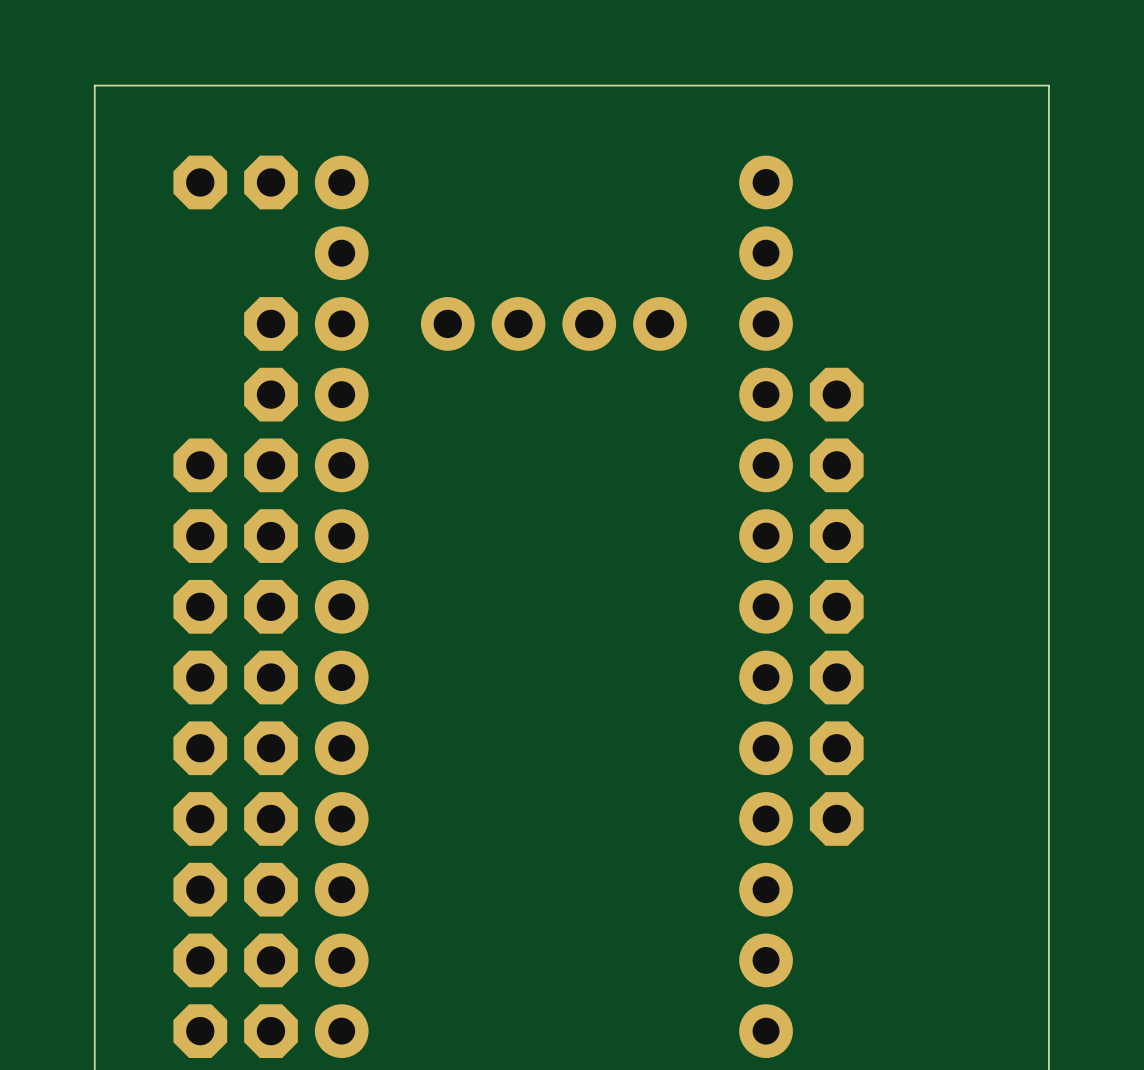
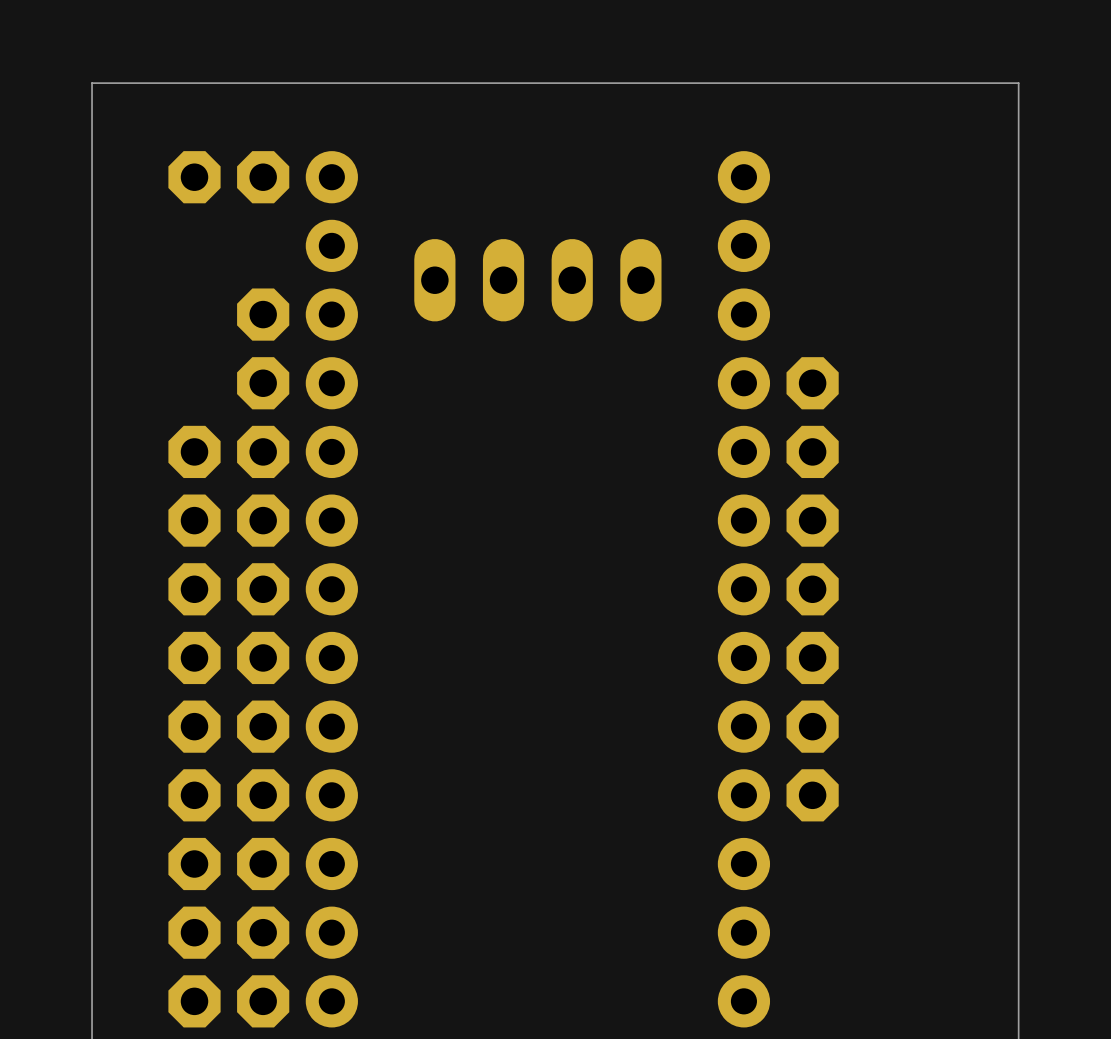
part: none -> (537, 280)
part: (553, 323) -> none

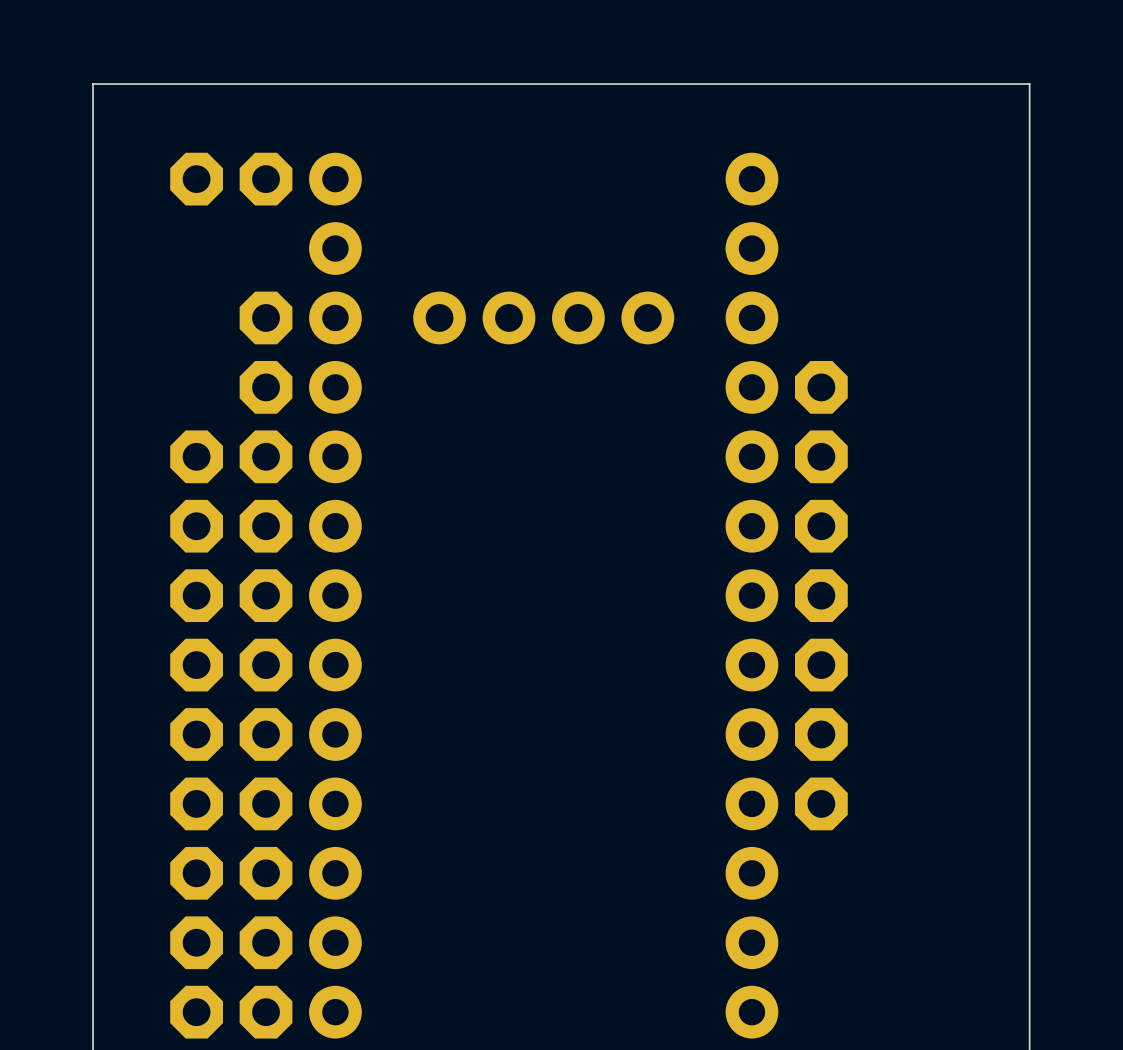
part: (537, 280) -> none
part: none -> (543, 317)

